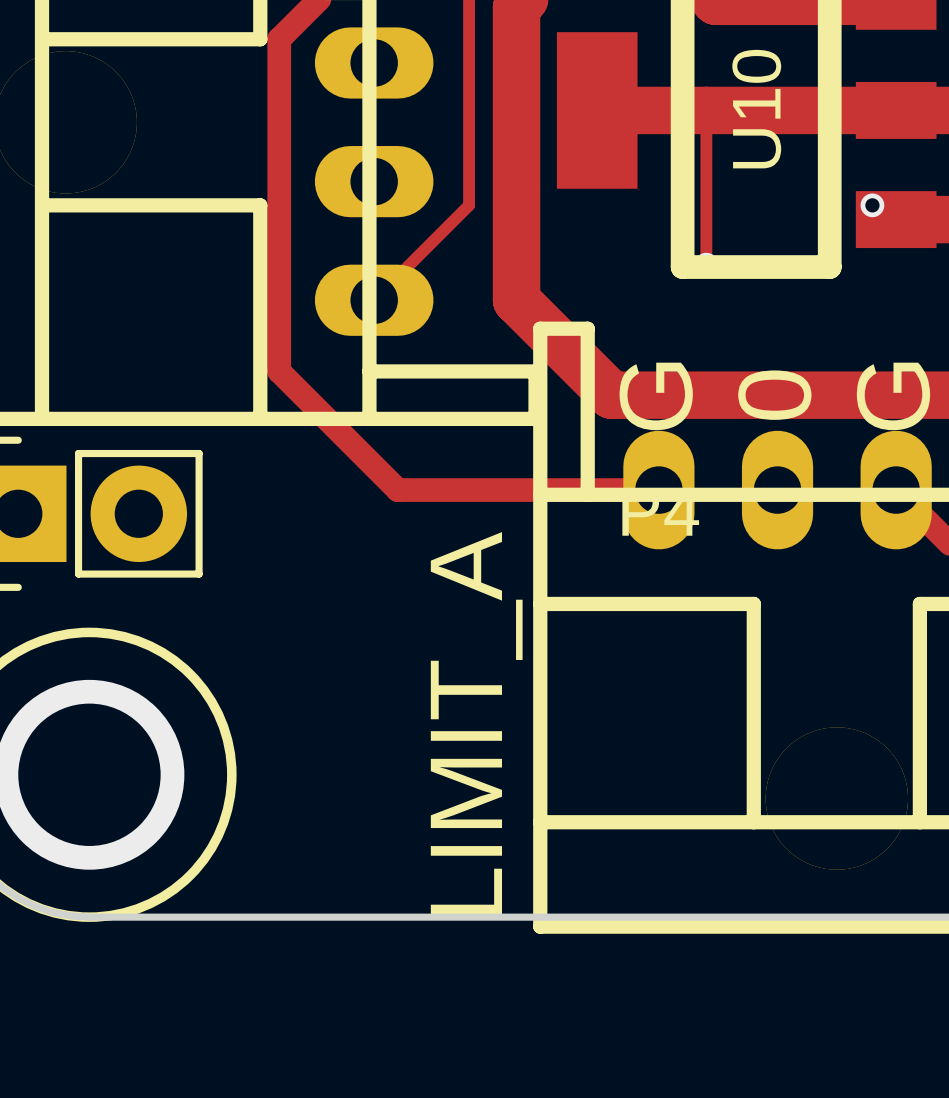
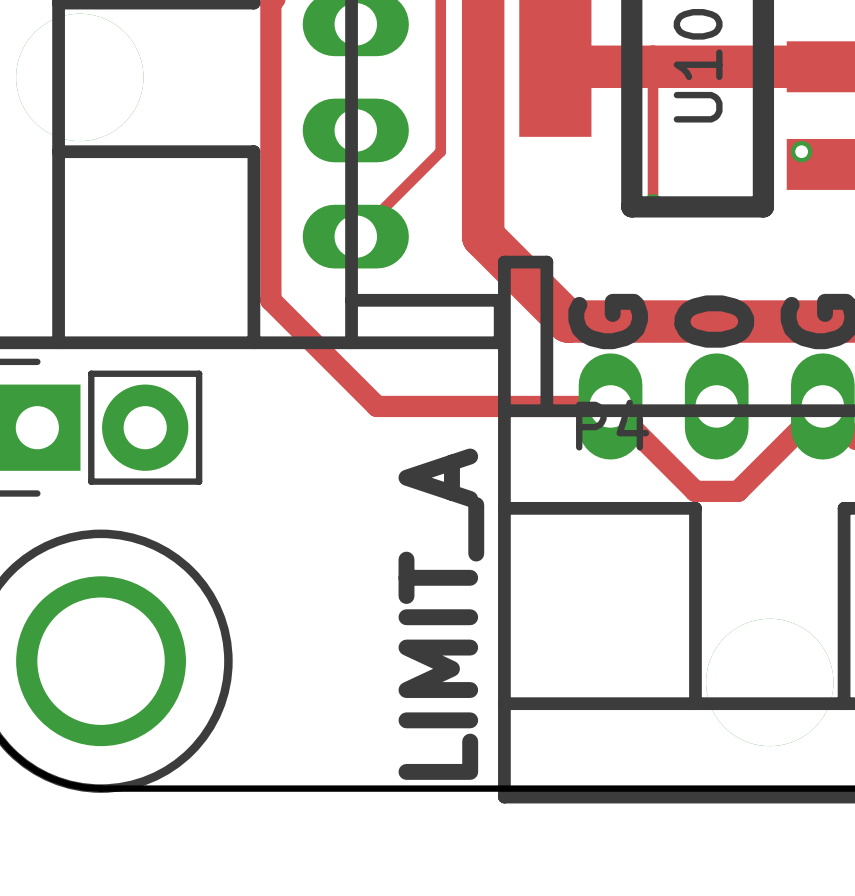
track: none -> (610, 406) (695, 491) (737, 491) (822, 406)

